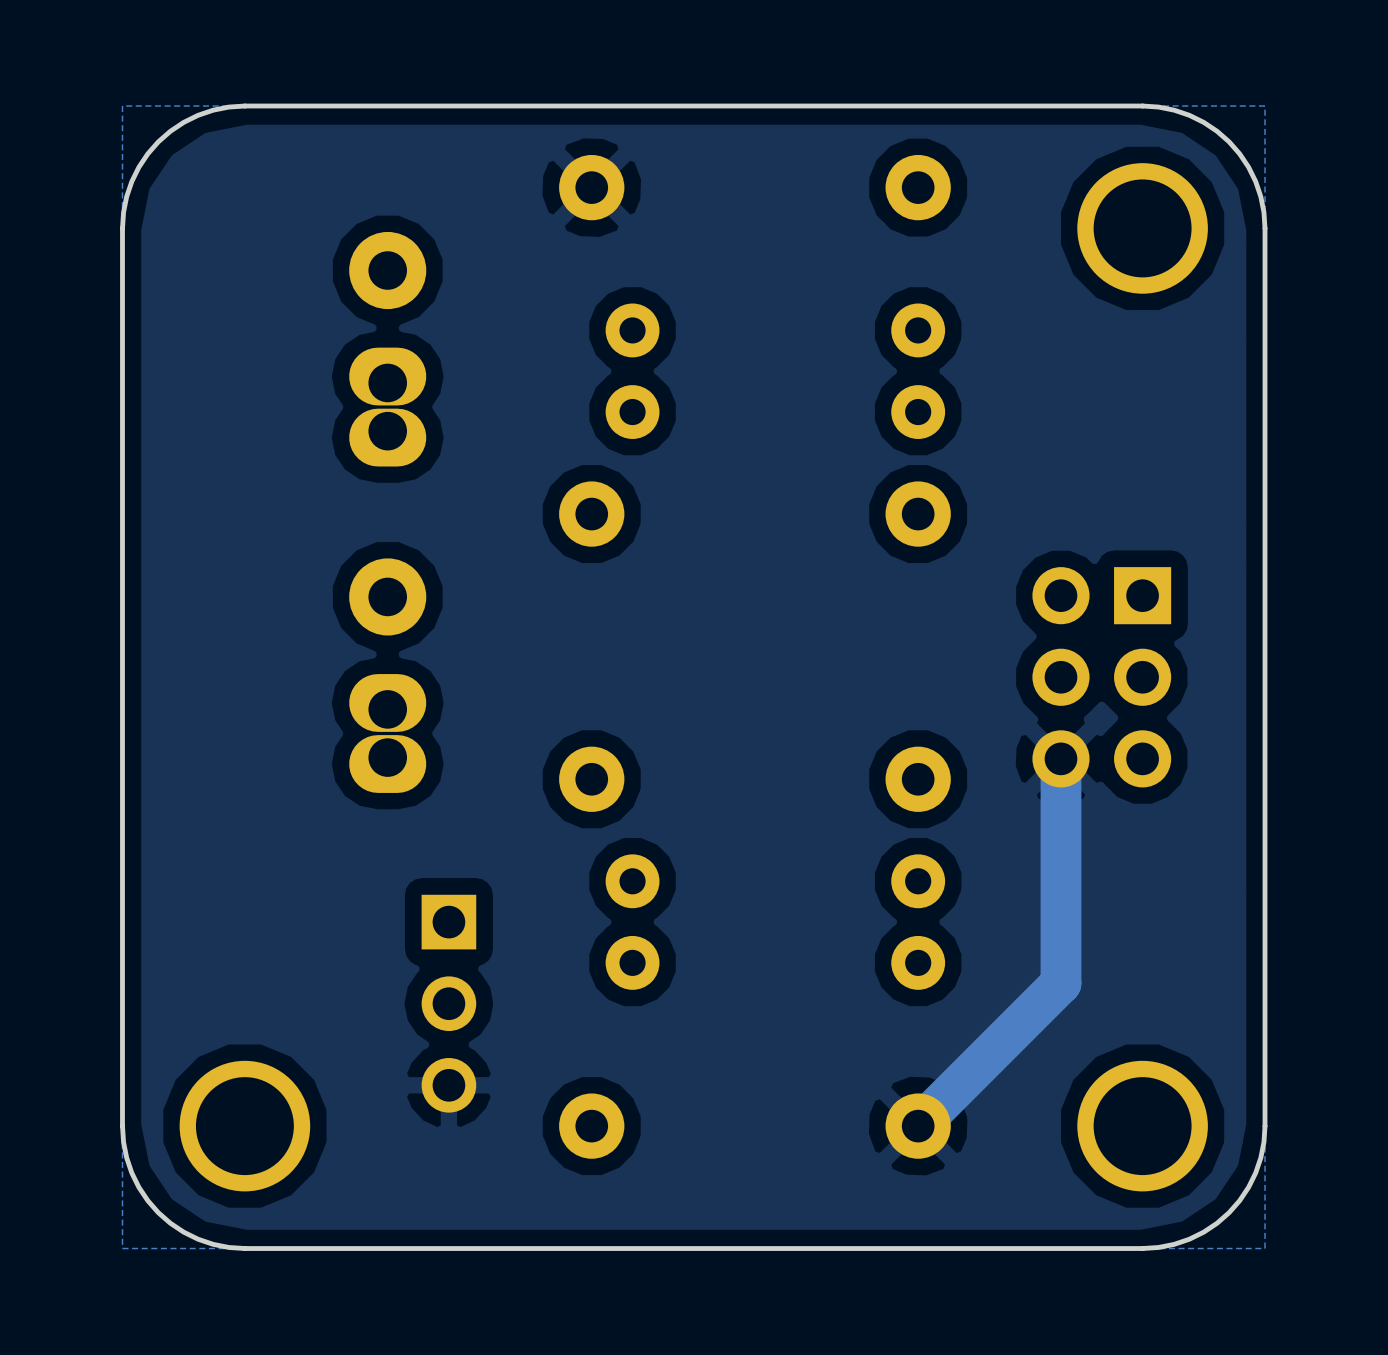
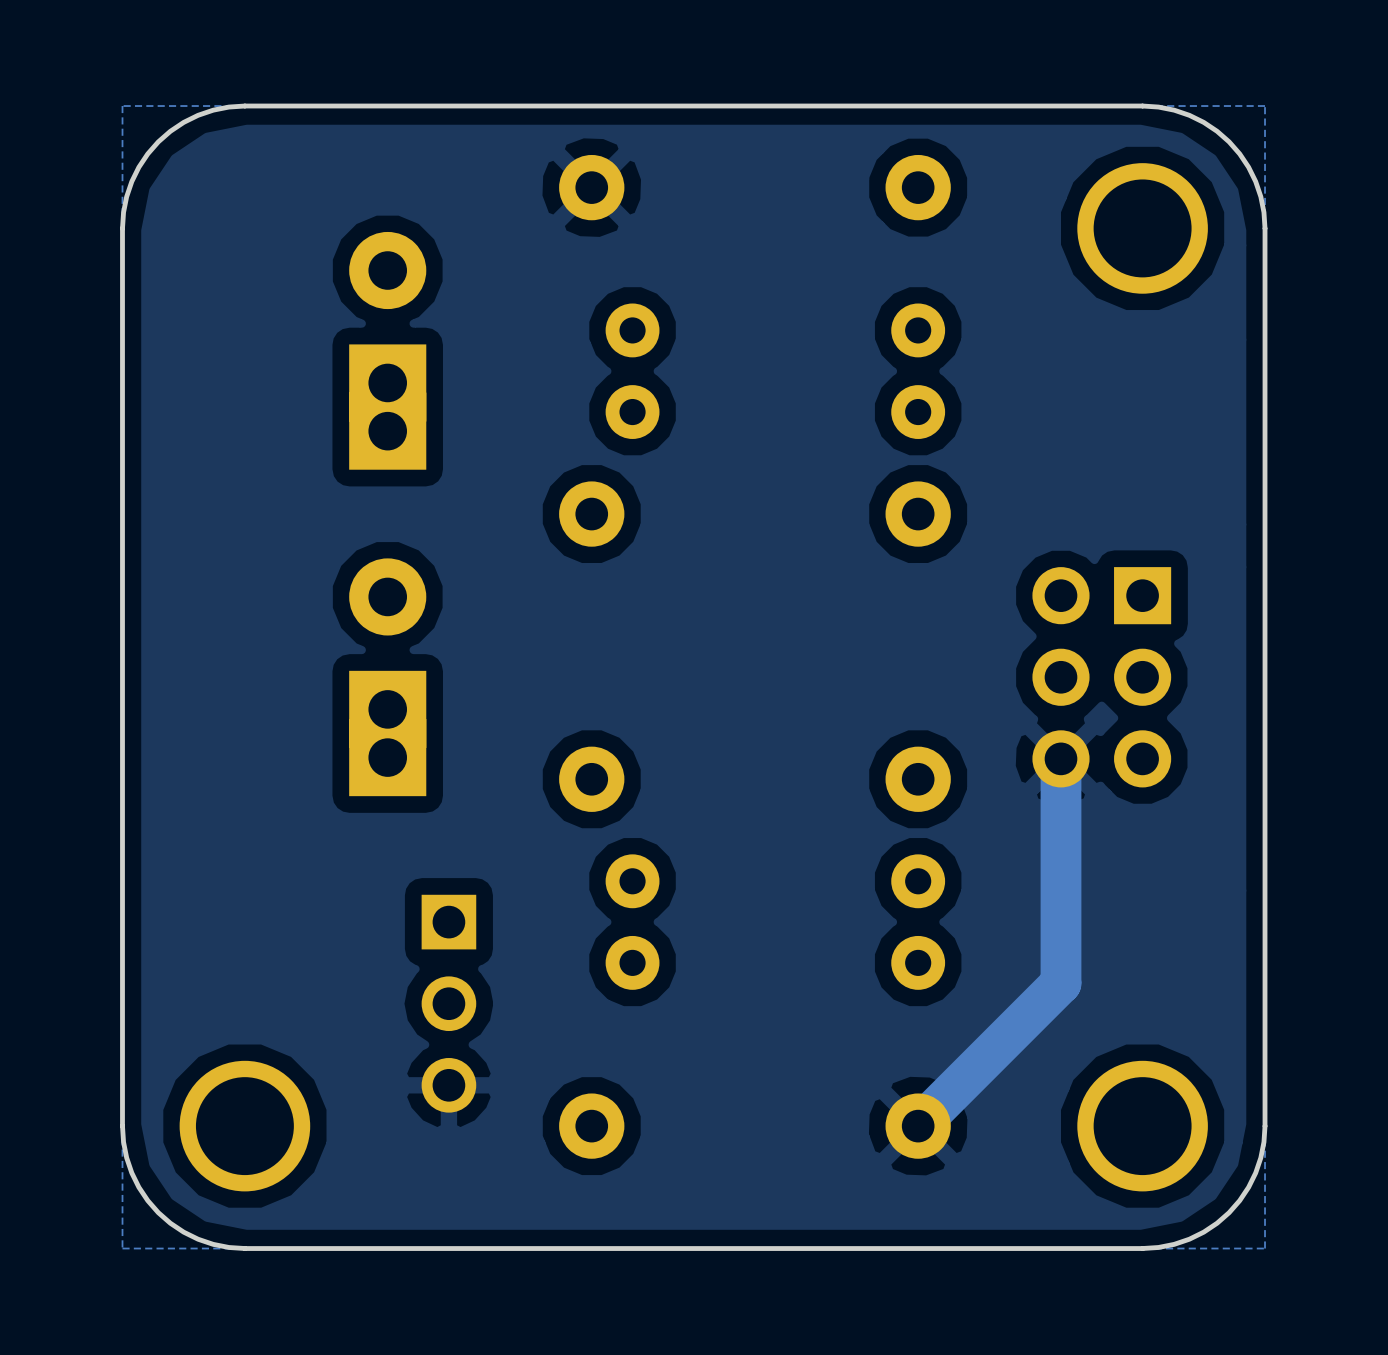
part footprint: [349, 231, 427, 467] -> [349, 231, 427, 470]
part footprint: [349, 558, 427, 793] -> [349, 558, 427, 797]

